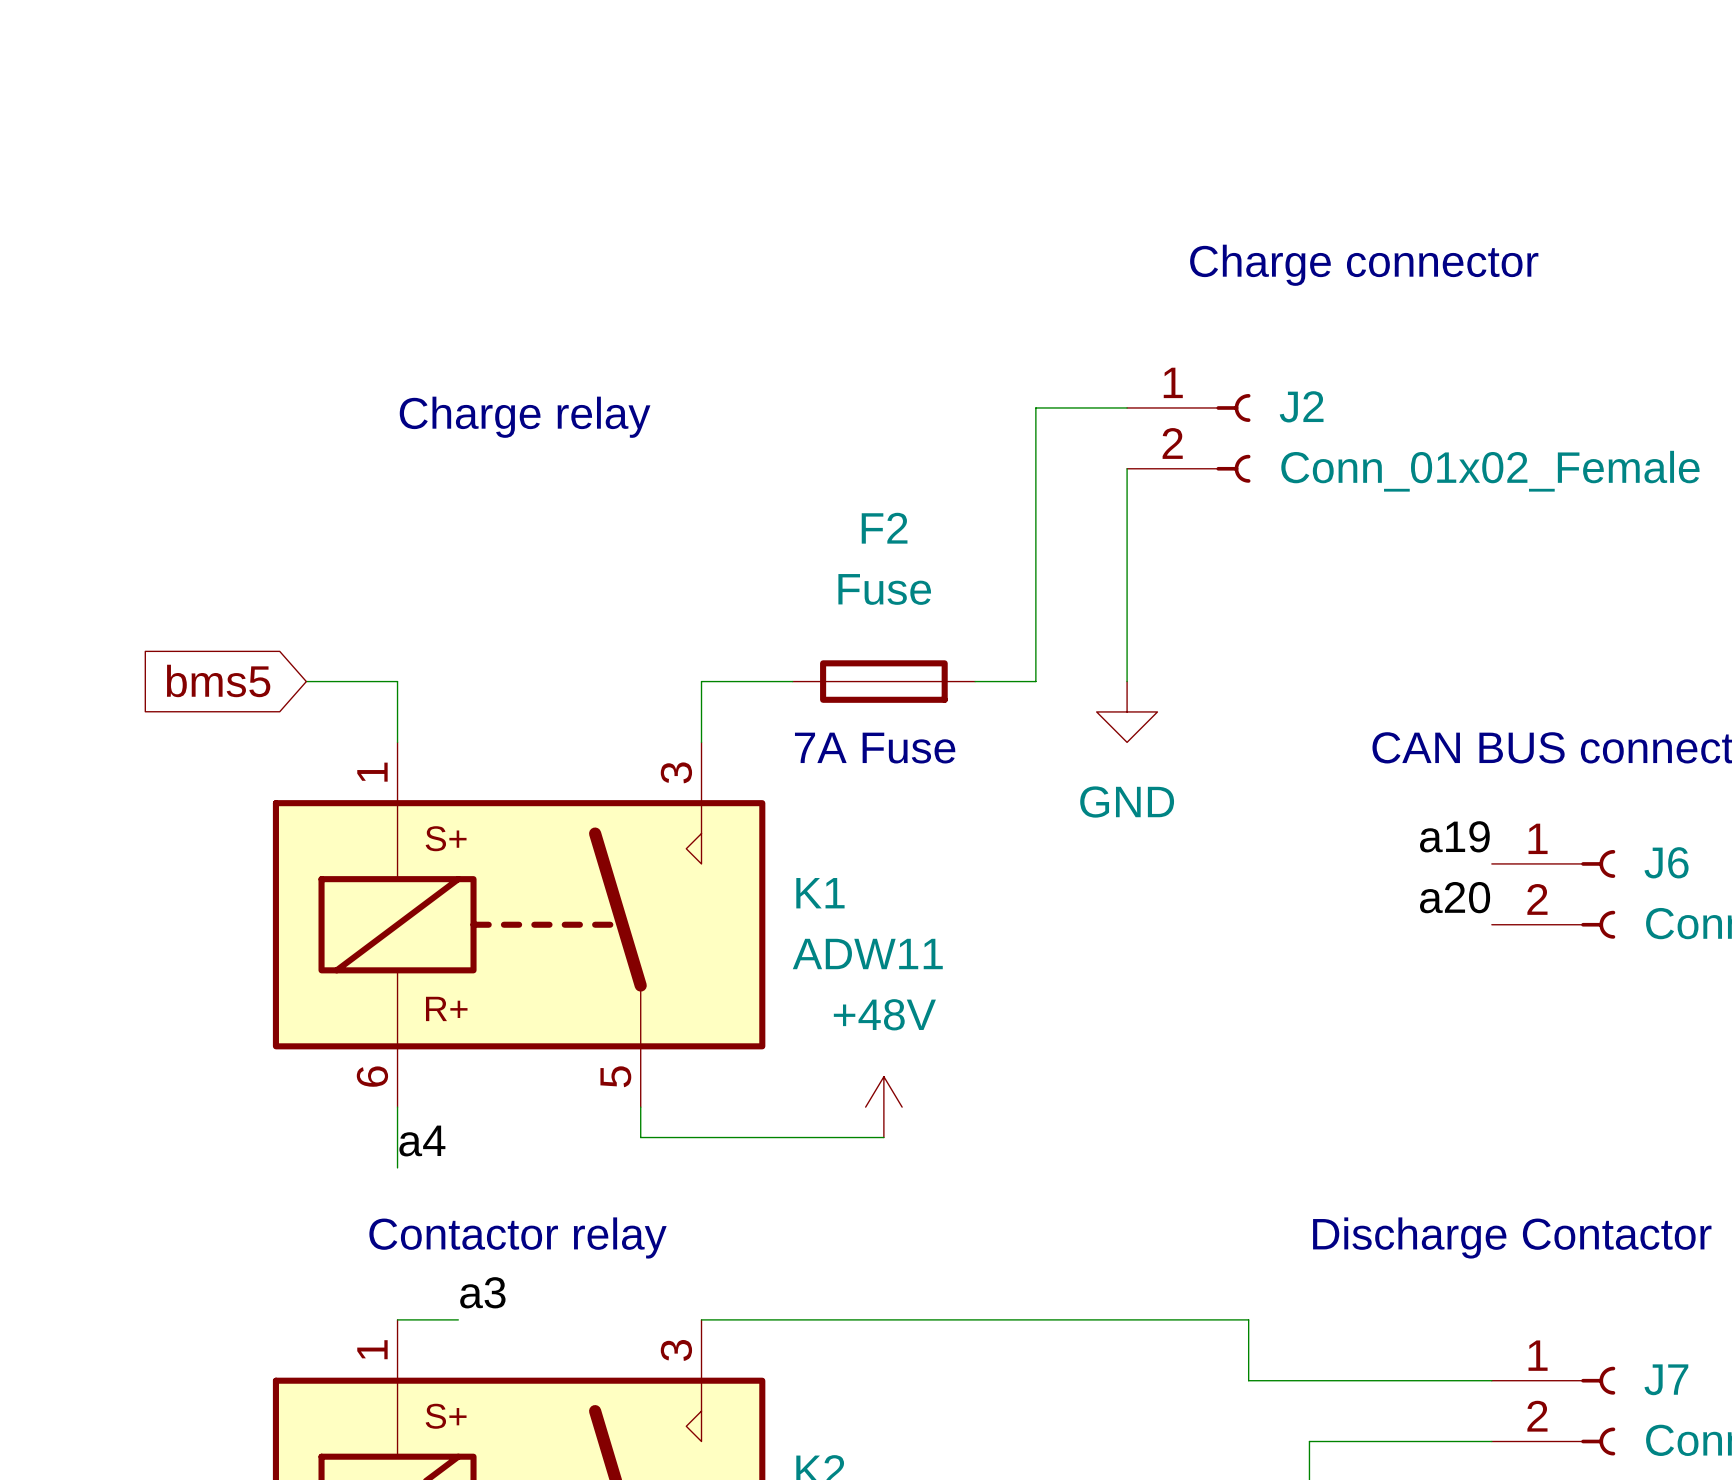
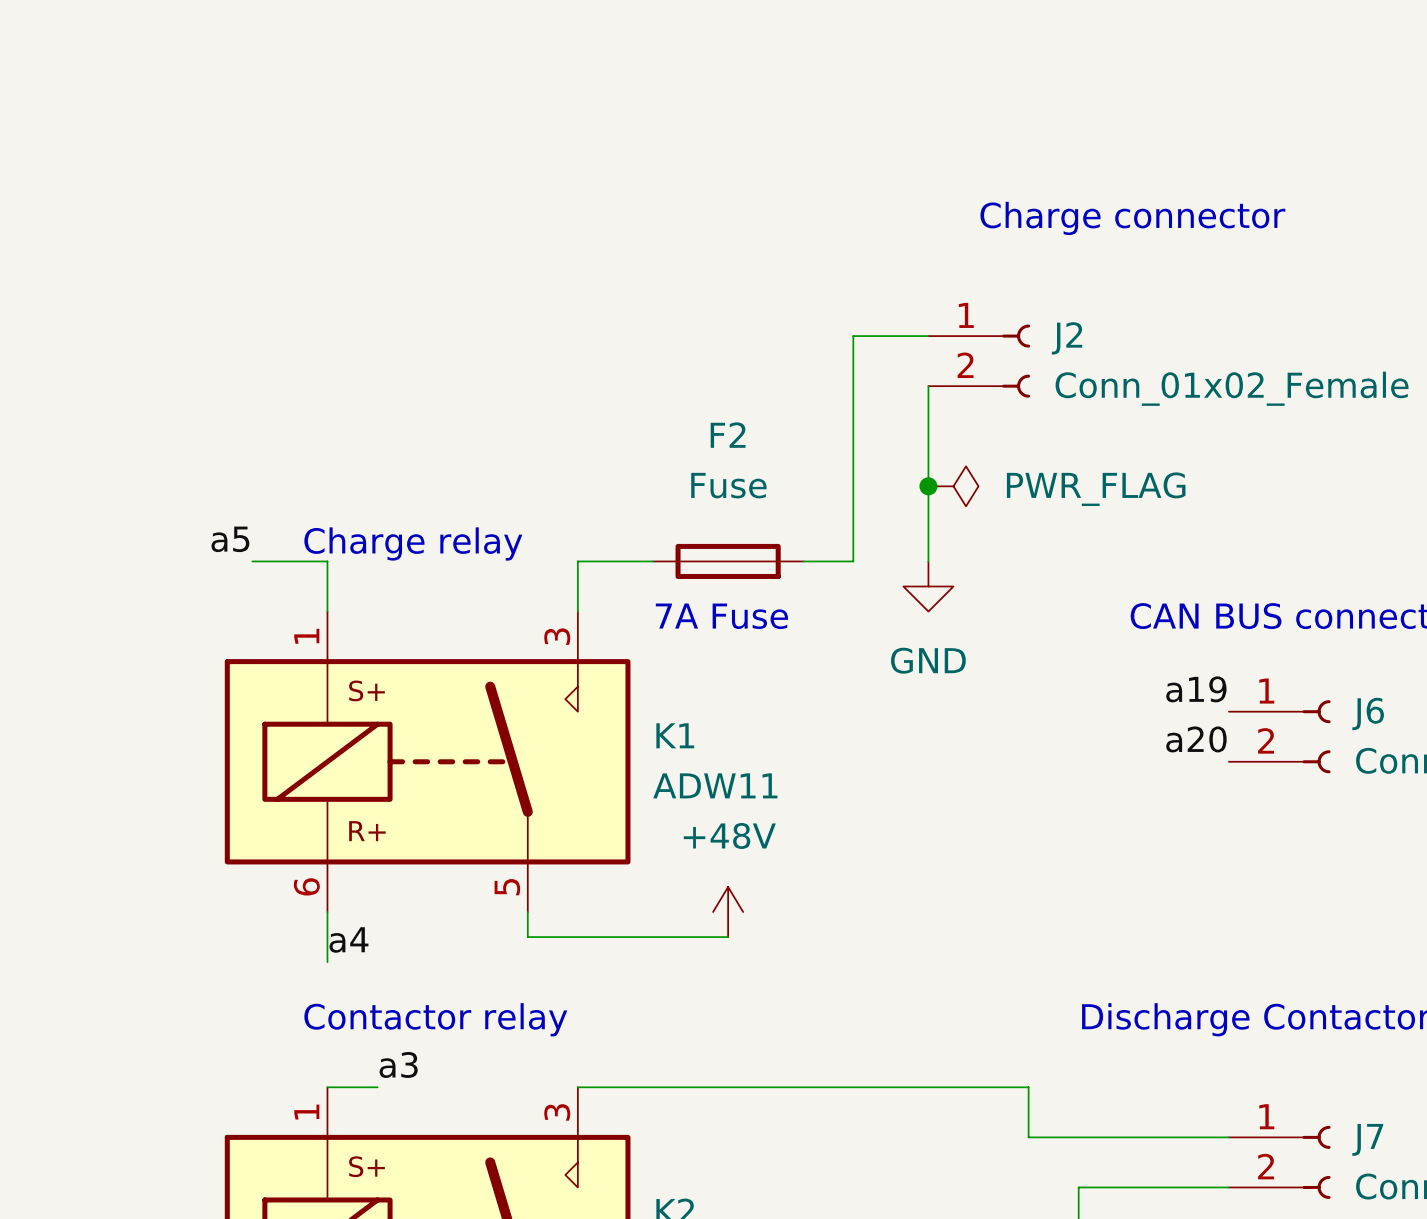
text position: Charge relay (525, 417) -> Charge relay (413, 543)
junction: none -> (928, 486)
power symbol: none -> PWR_FLAG (953, 486)
label: none -> a5 (230, 539)
global label: bms5 (218, 680) -> none

